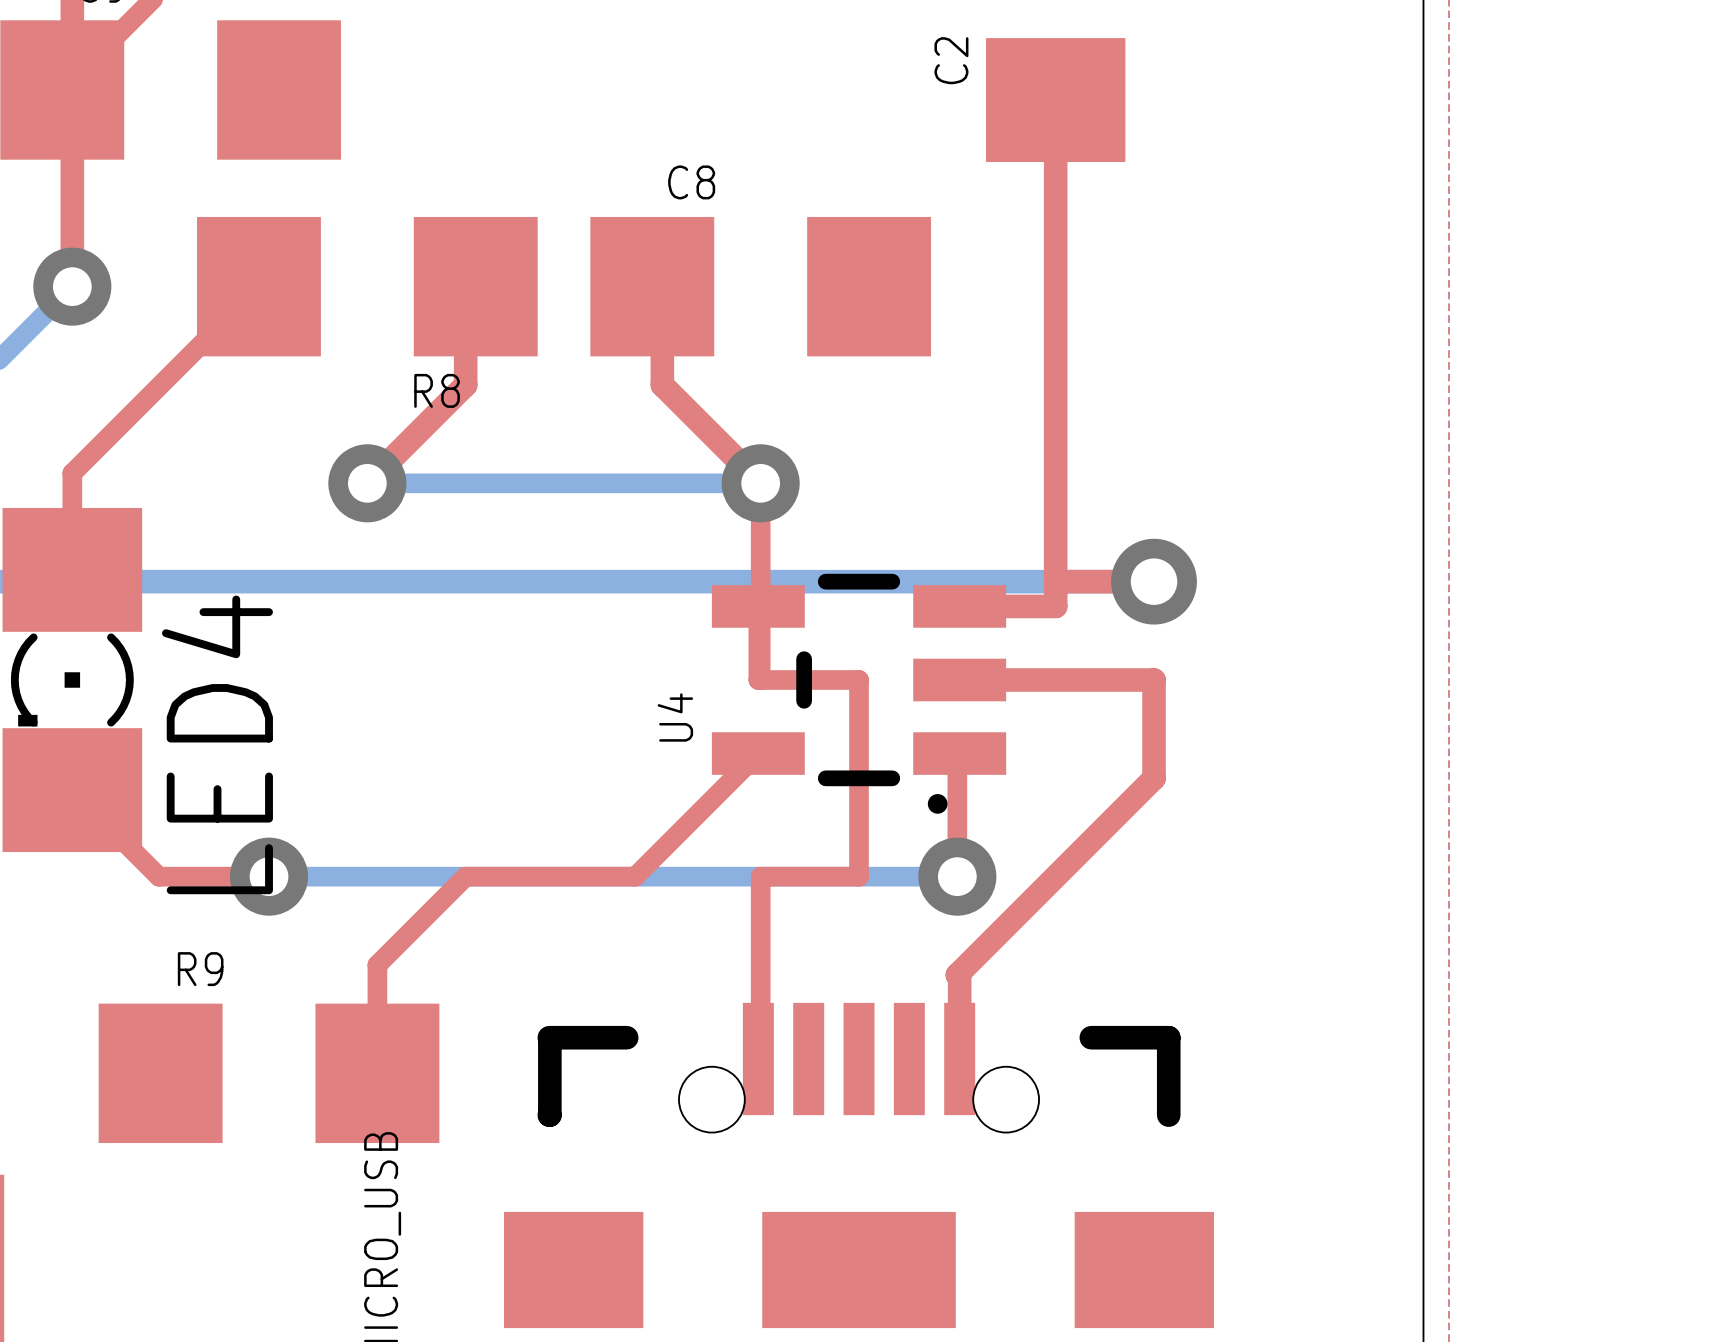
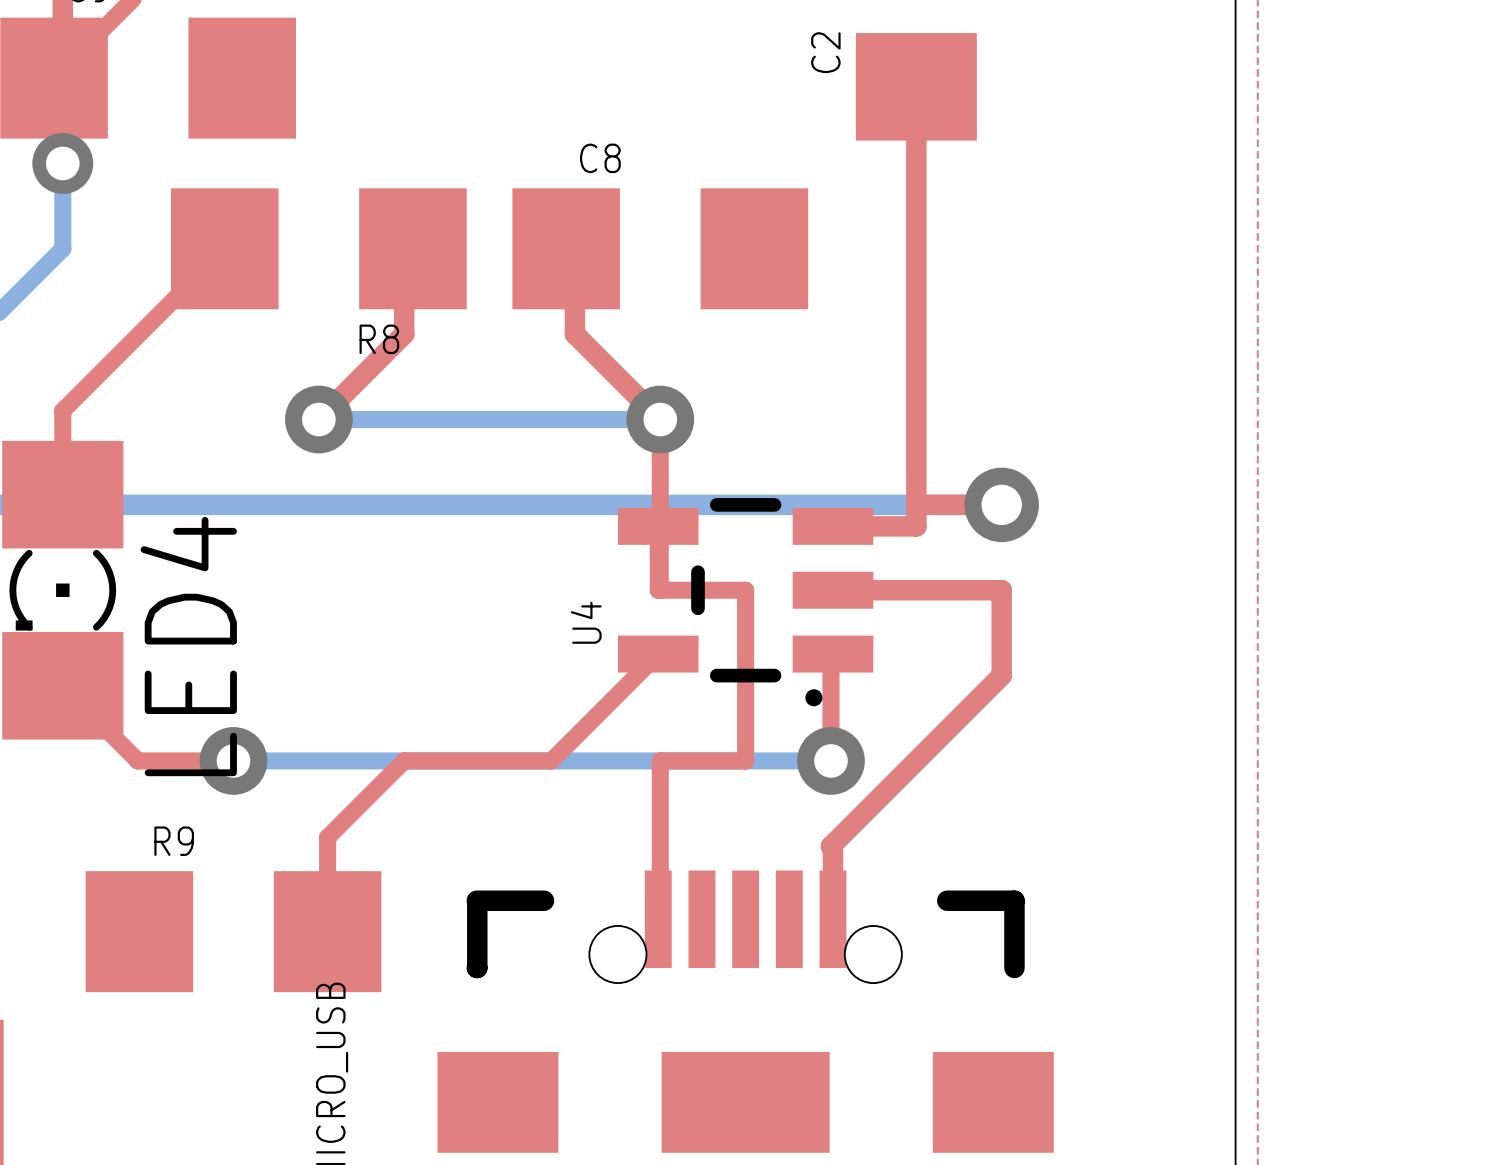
bottom track: none -> (62, 163) (62, 248)
top track: (72, 188) (72, 286) -> none
via: none -> (62, 163)
via: (72, 286) -> none

